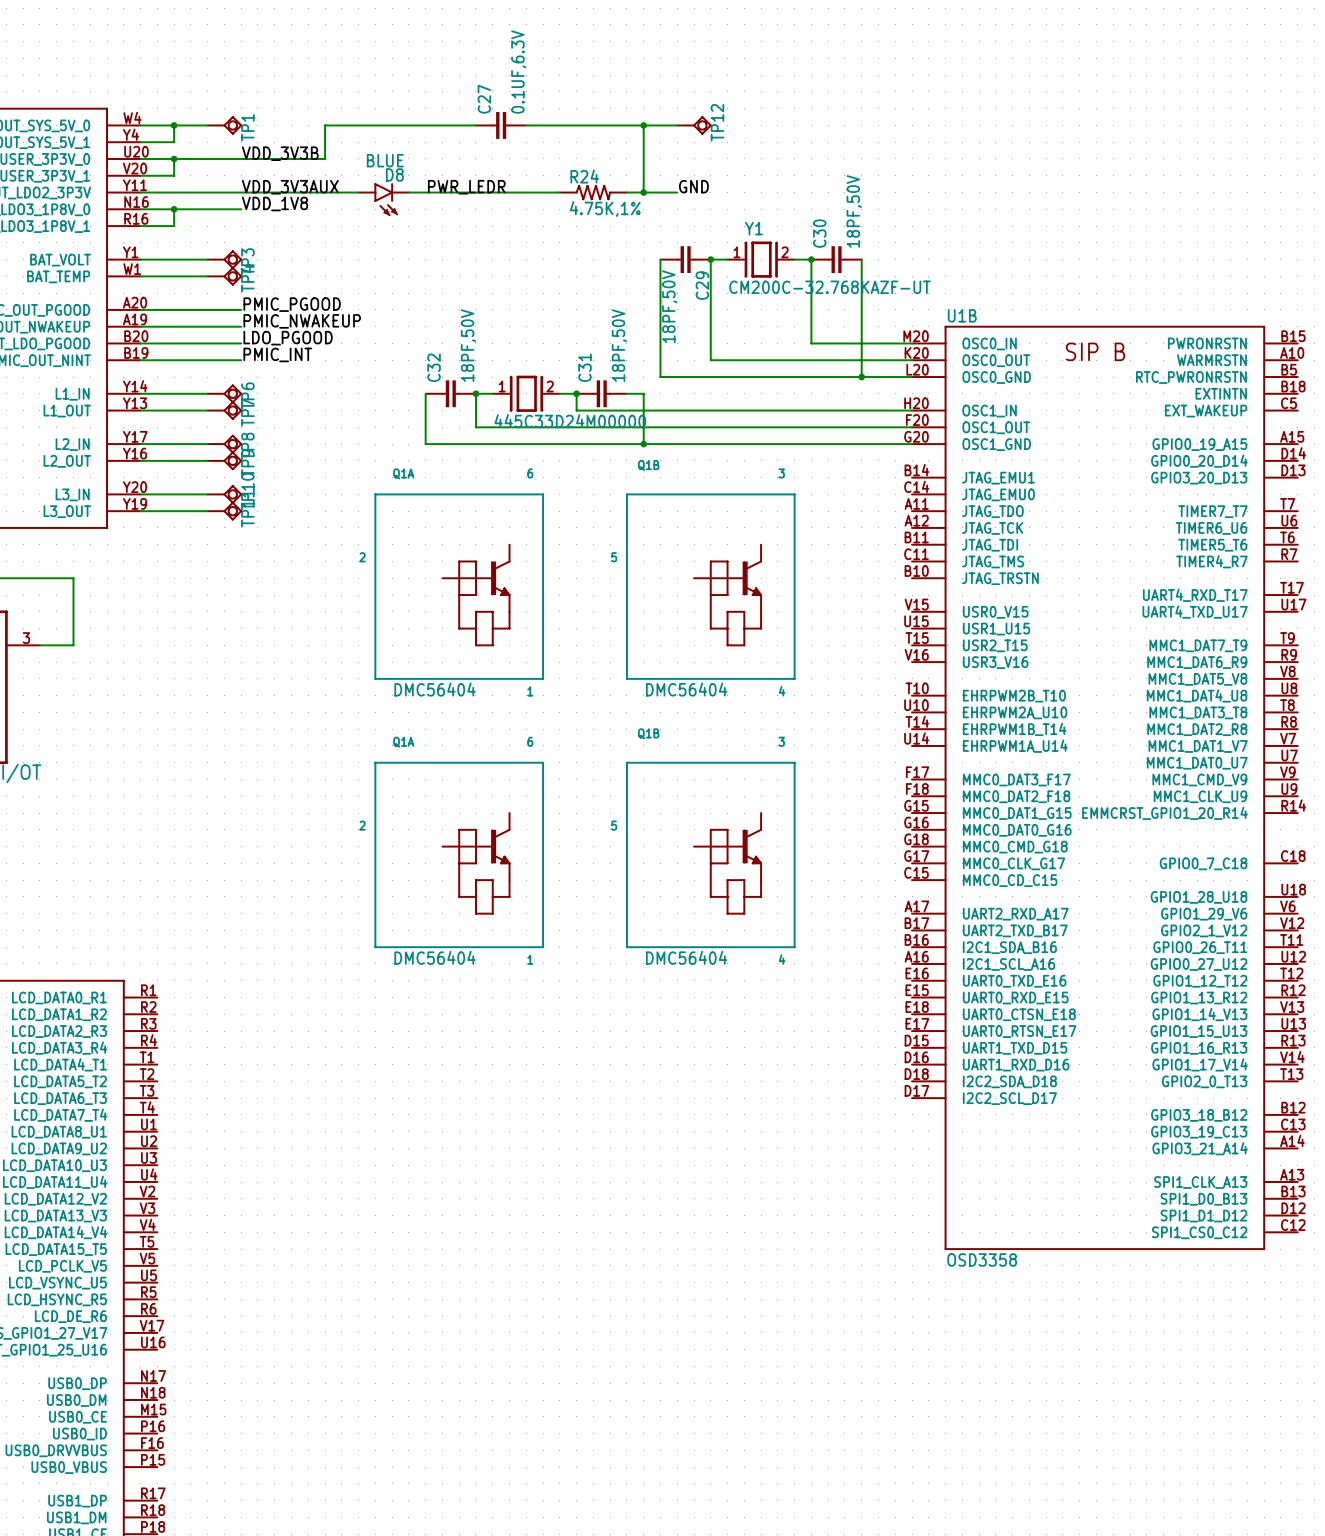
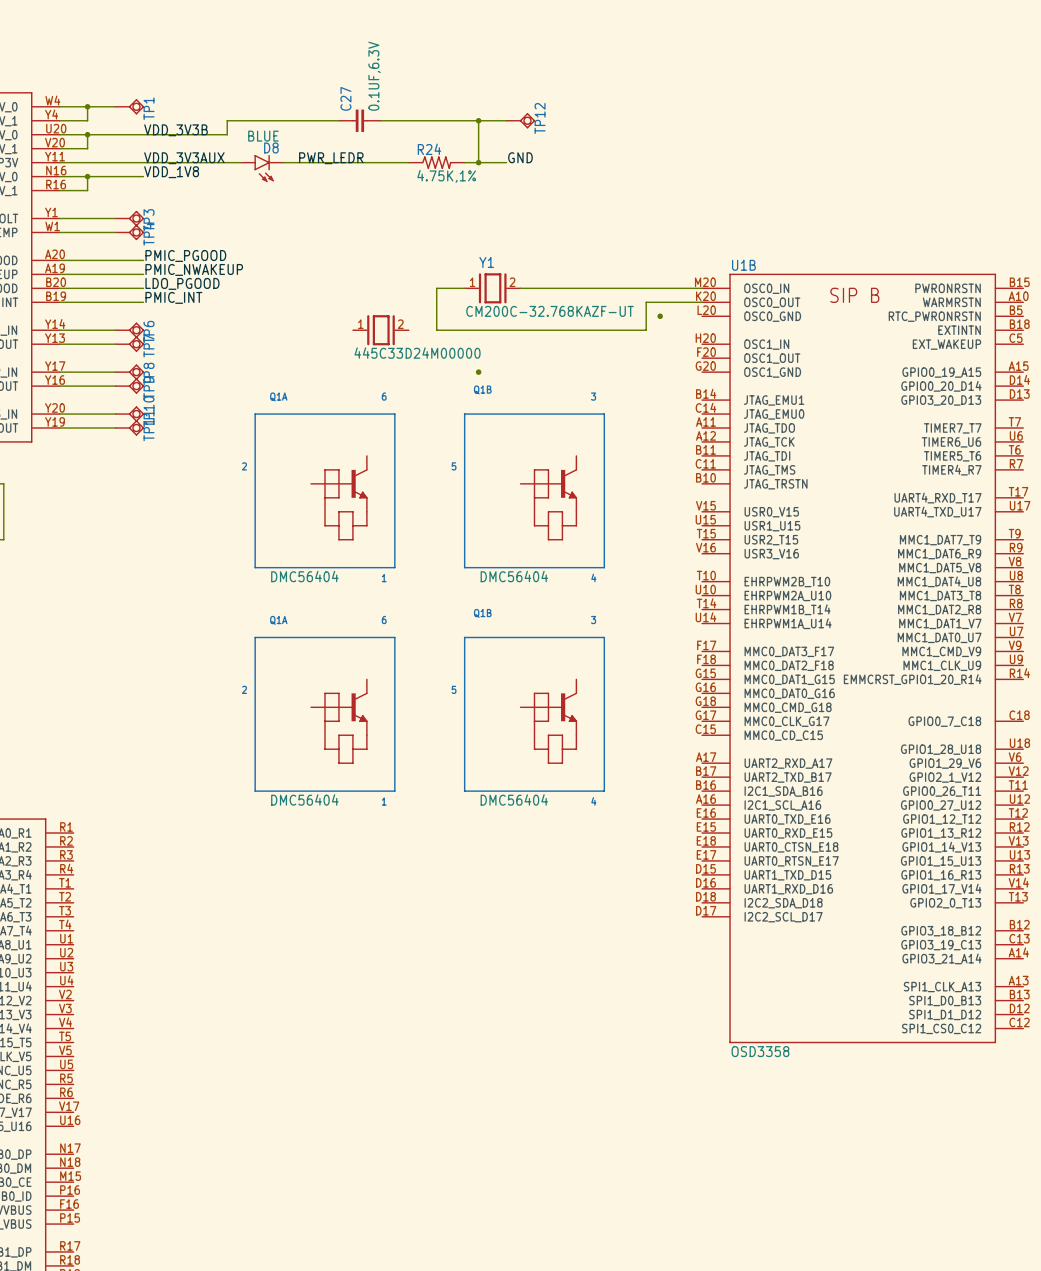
wire: (475, 125) (325, 125) (325, 158) -> (338, 120) (227, 120) (227, 134) (213, 134)
C27 position: (501, 125) -> (359, 120)
wire: (526, 125) (677, 125) -> (380, 120) (506, 120)
wire: (643, 125) (643, 142) -> none
junction position: (643, 125) -> (478, 120)
TP12 position: (694, 125) -> (520, 120)
wire: (660, 259) (660, 377) (912, 377) -> none
C29: 18PF,50V (685, 259) -> none
junction: (710, 259) -> none
wire: (727, 259) (710, 259) (710, 360) (844, 360) -> (478, 330) (646, 330) (646, 302)
part position: (761, 259) -> (492, 288)
wire: (794, 259) (811, 259) (811, 343) -> (520, 288) (618, 288)
junction: (811, 259) -> none
C30: 18PF,50V (836, 259) -> none
wire: (861, 259) (861, 377) -> none
wire: none -> (464, 288) (436, 288) (436, 330) (464, 330)
wire: (425, 393) (425, 444) (912, 444) -> none
C32: 18PF,50V (450, 393) -> none
junction: (475, 393) -> none
wire: (492, 393) (475, 393) (475, 427) (912, 427) -> none
wire: (559, 393) (576, 393) (576, 410) (912, 410) -> none
junction: (576, 393) -> none
C31: 18PF,50V (601, 393) -> none
wire: (643, 393) (643, 444) -> none

